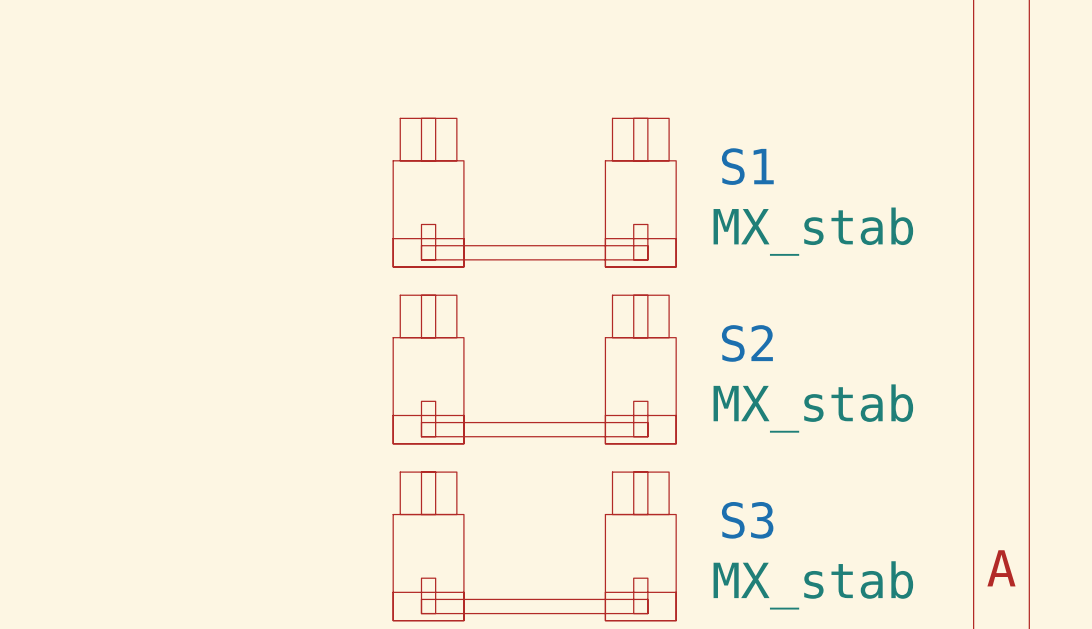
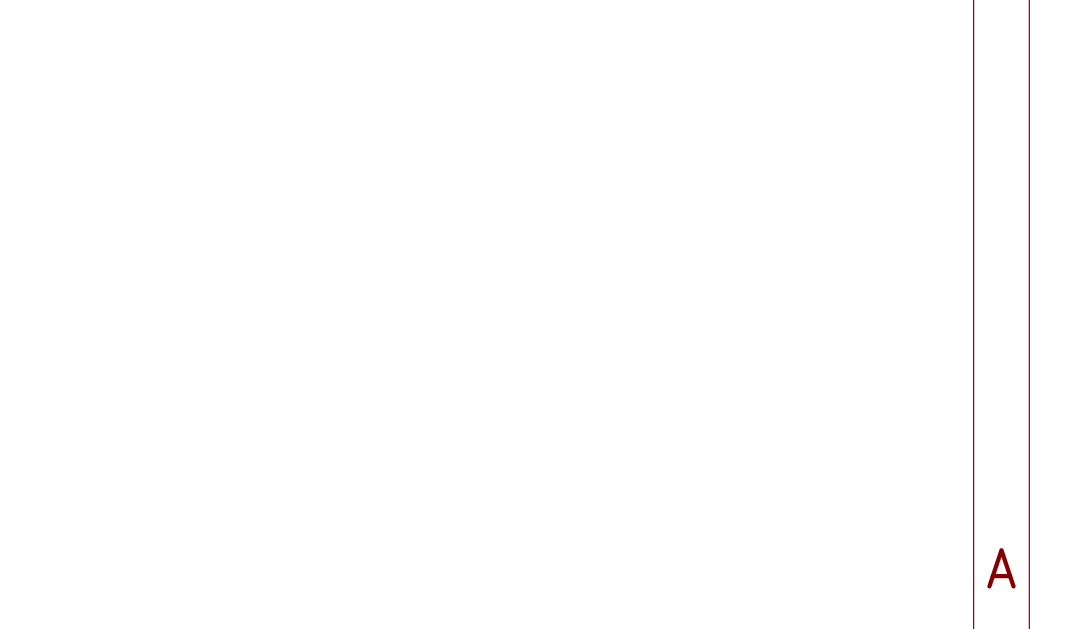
S1: MX_stab (534, 192) -> none
S2: MX_stab (534, 369) -> none
S3: MX_stab (534, 546) -> none

